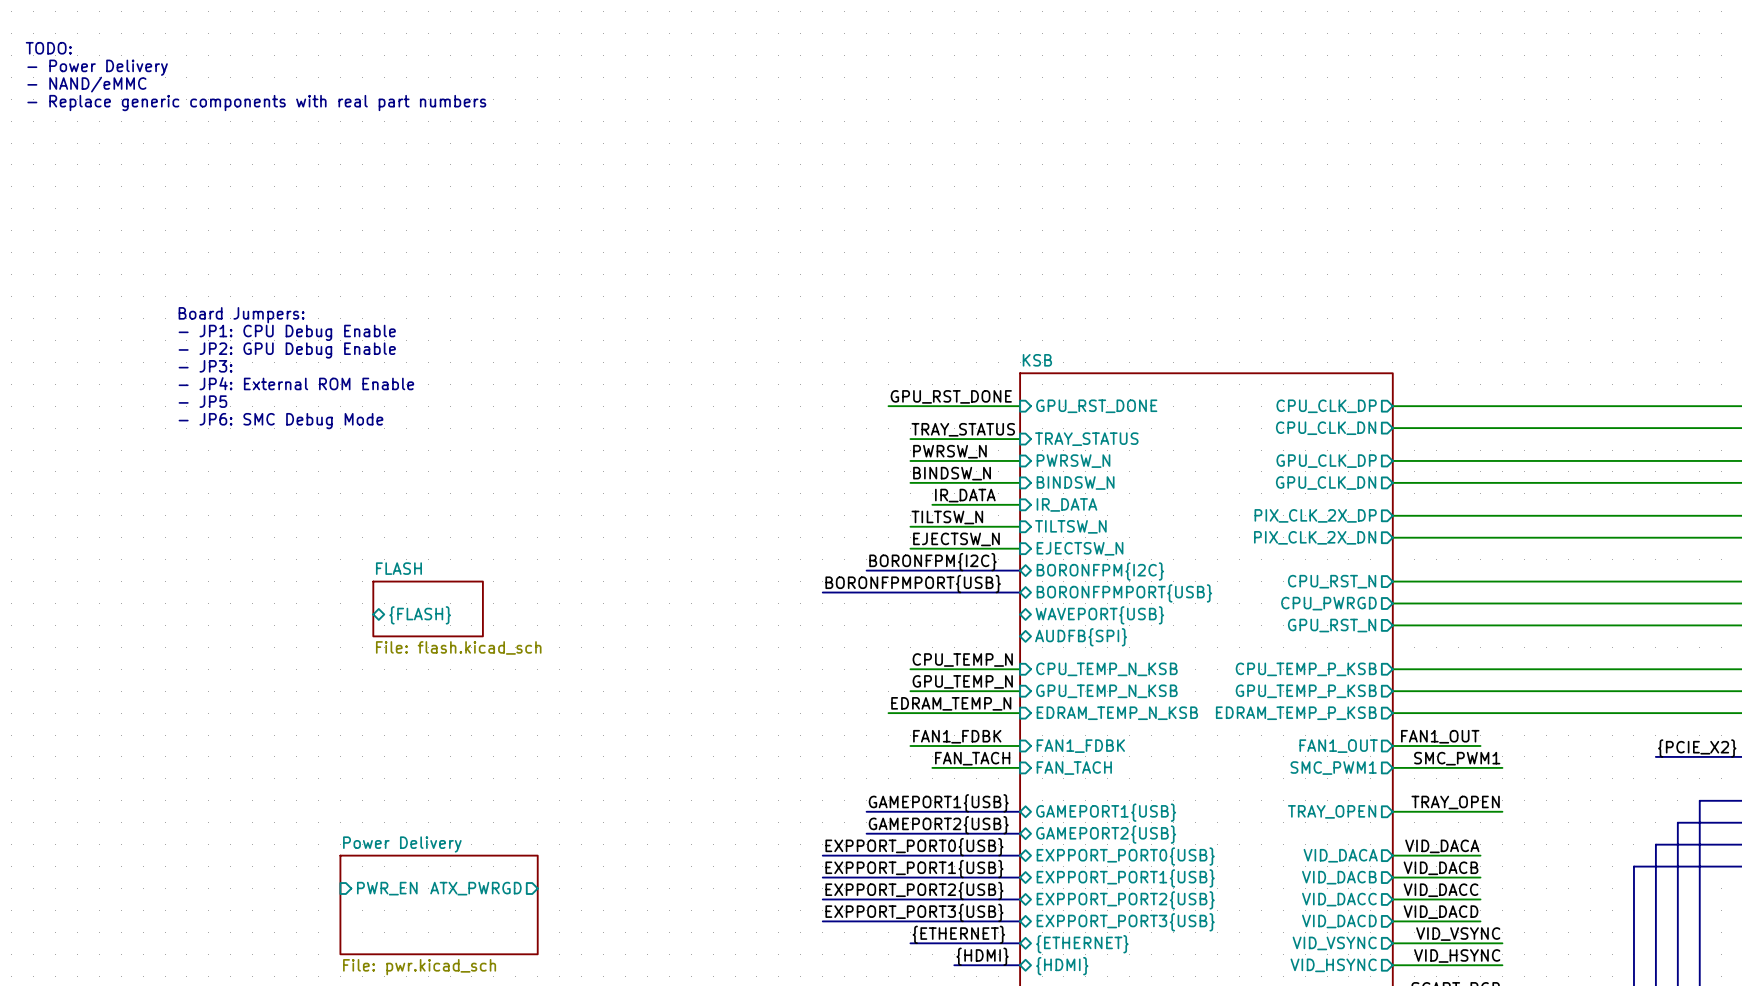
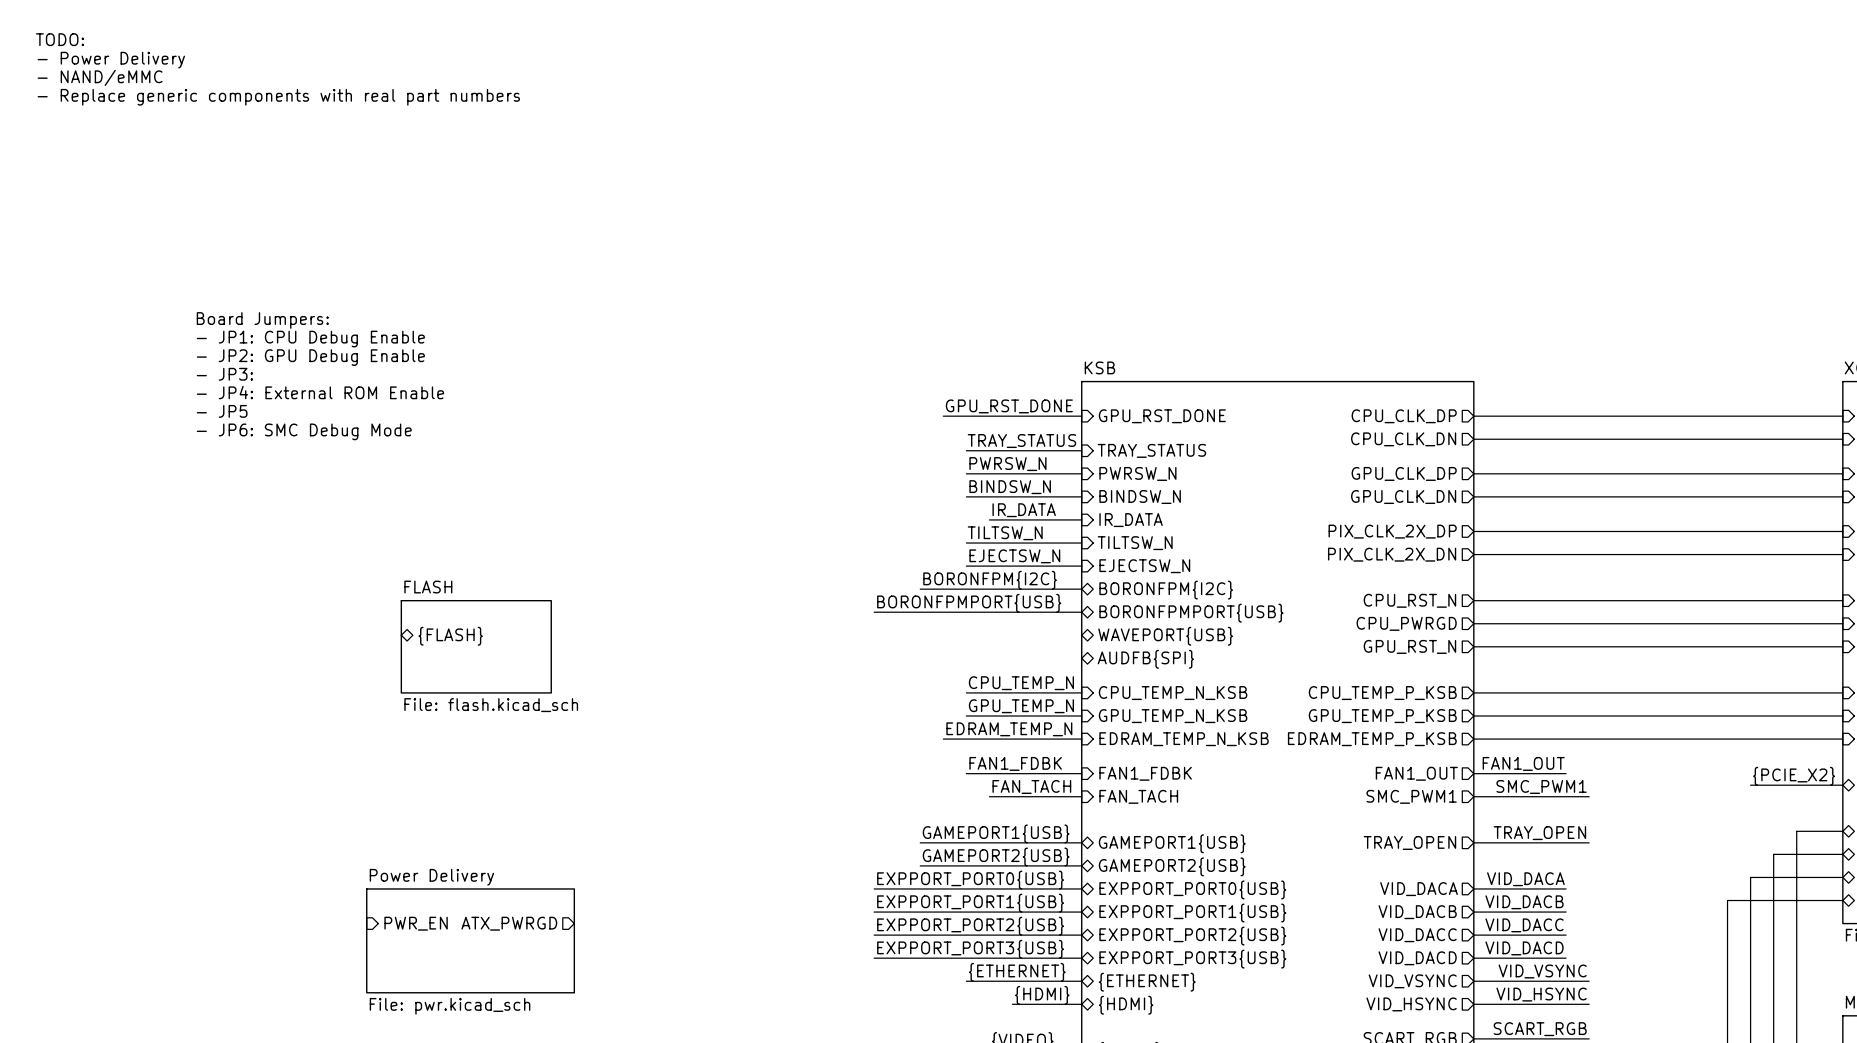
sheet FLASH: File: flash.kicad_sch (428, 608) -> none
sheet FLASH: none -> File: flash.kicad_sch (476, 646)

